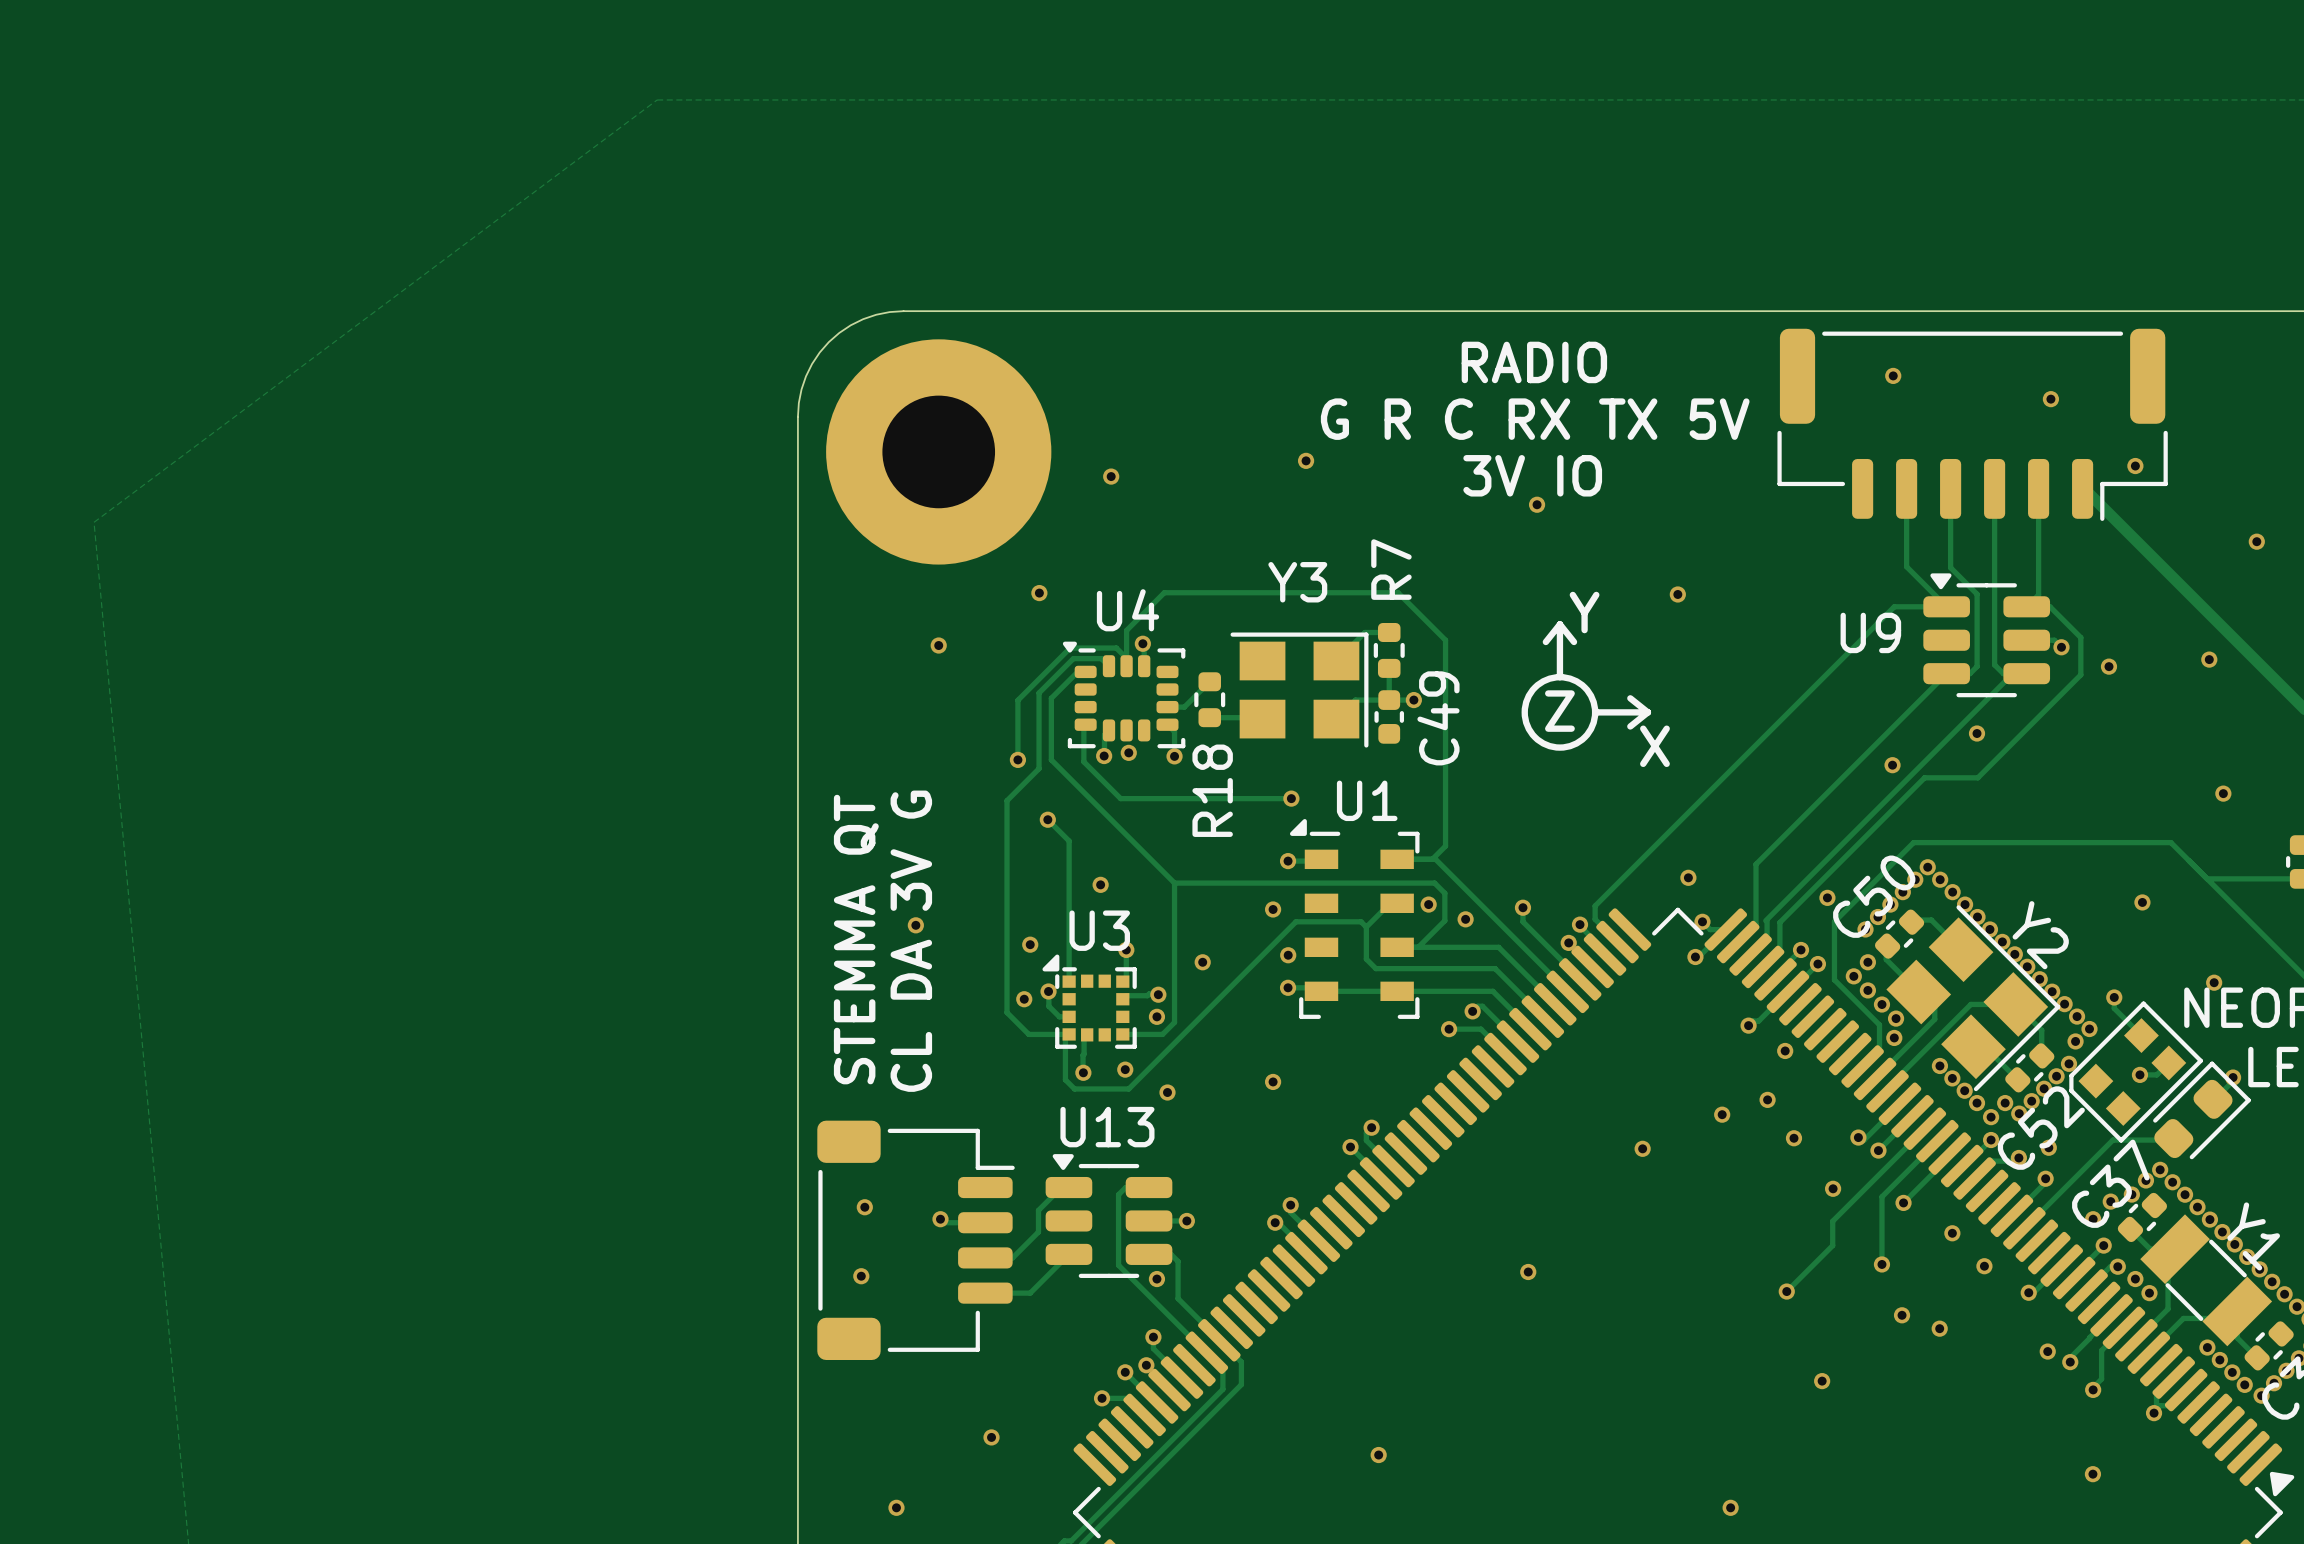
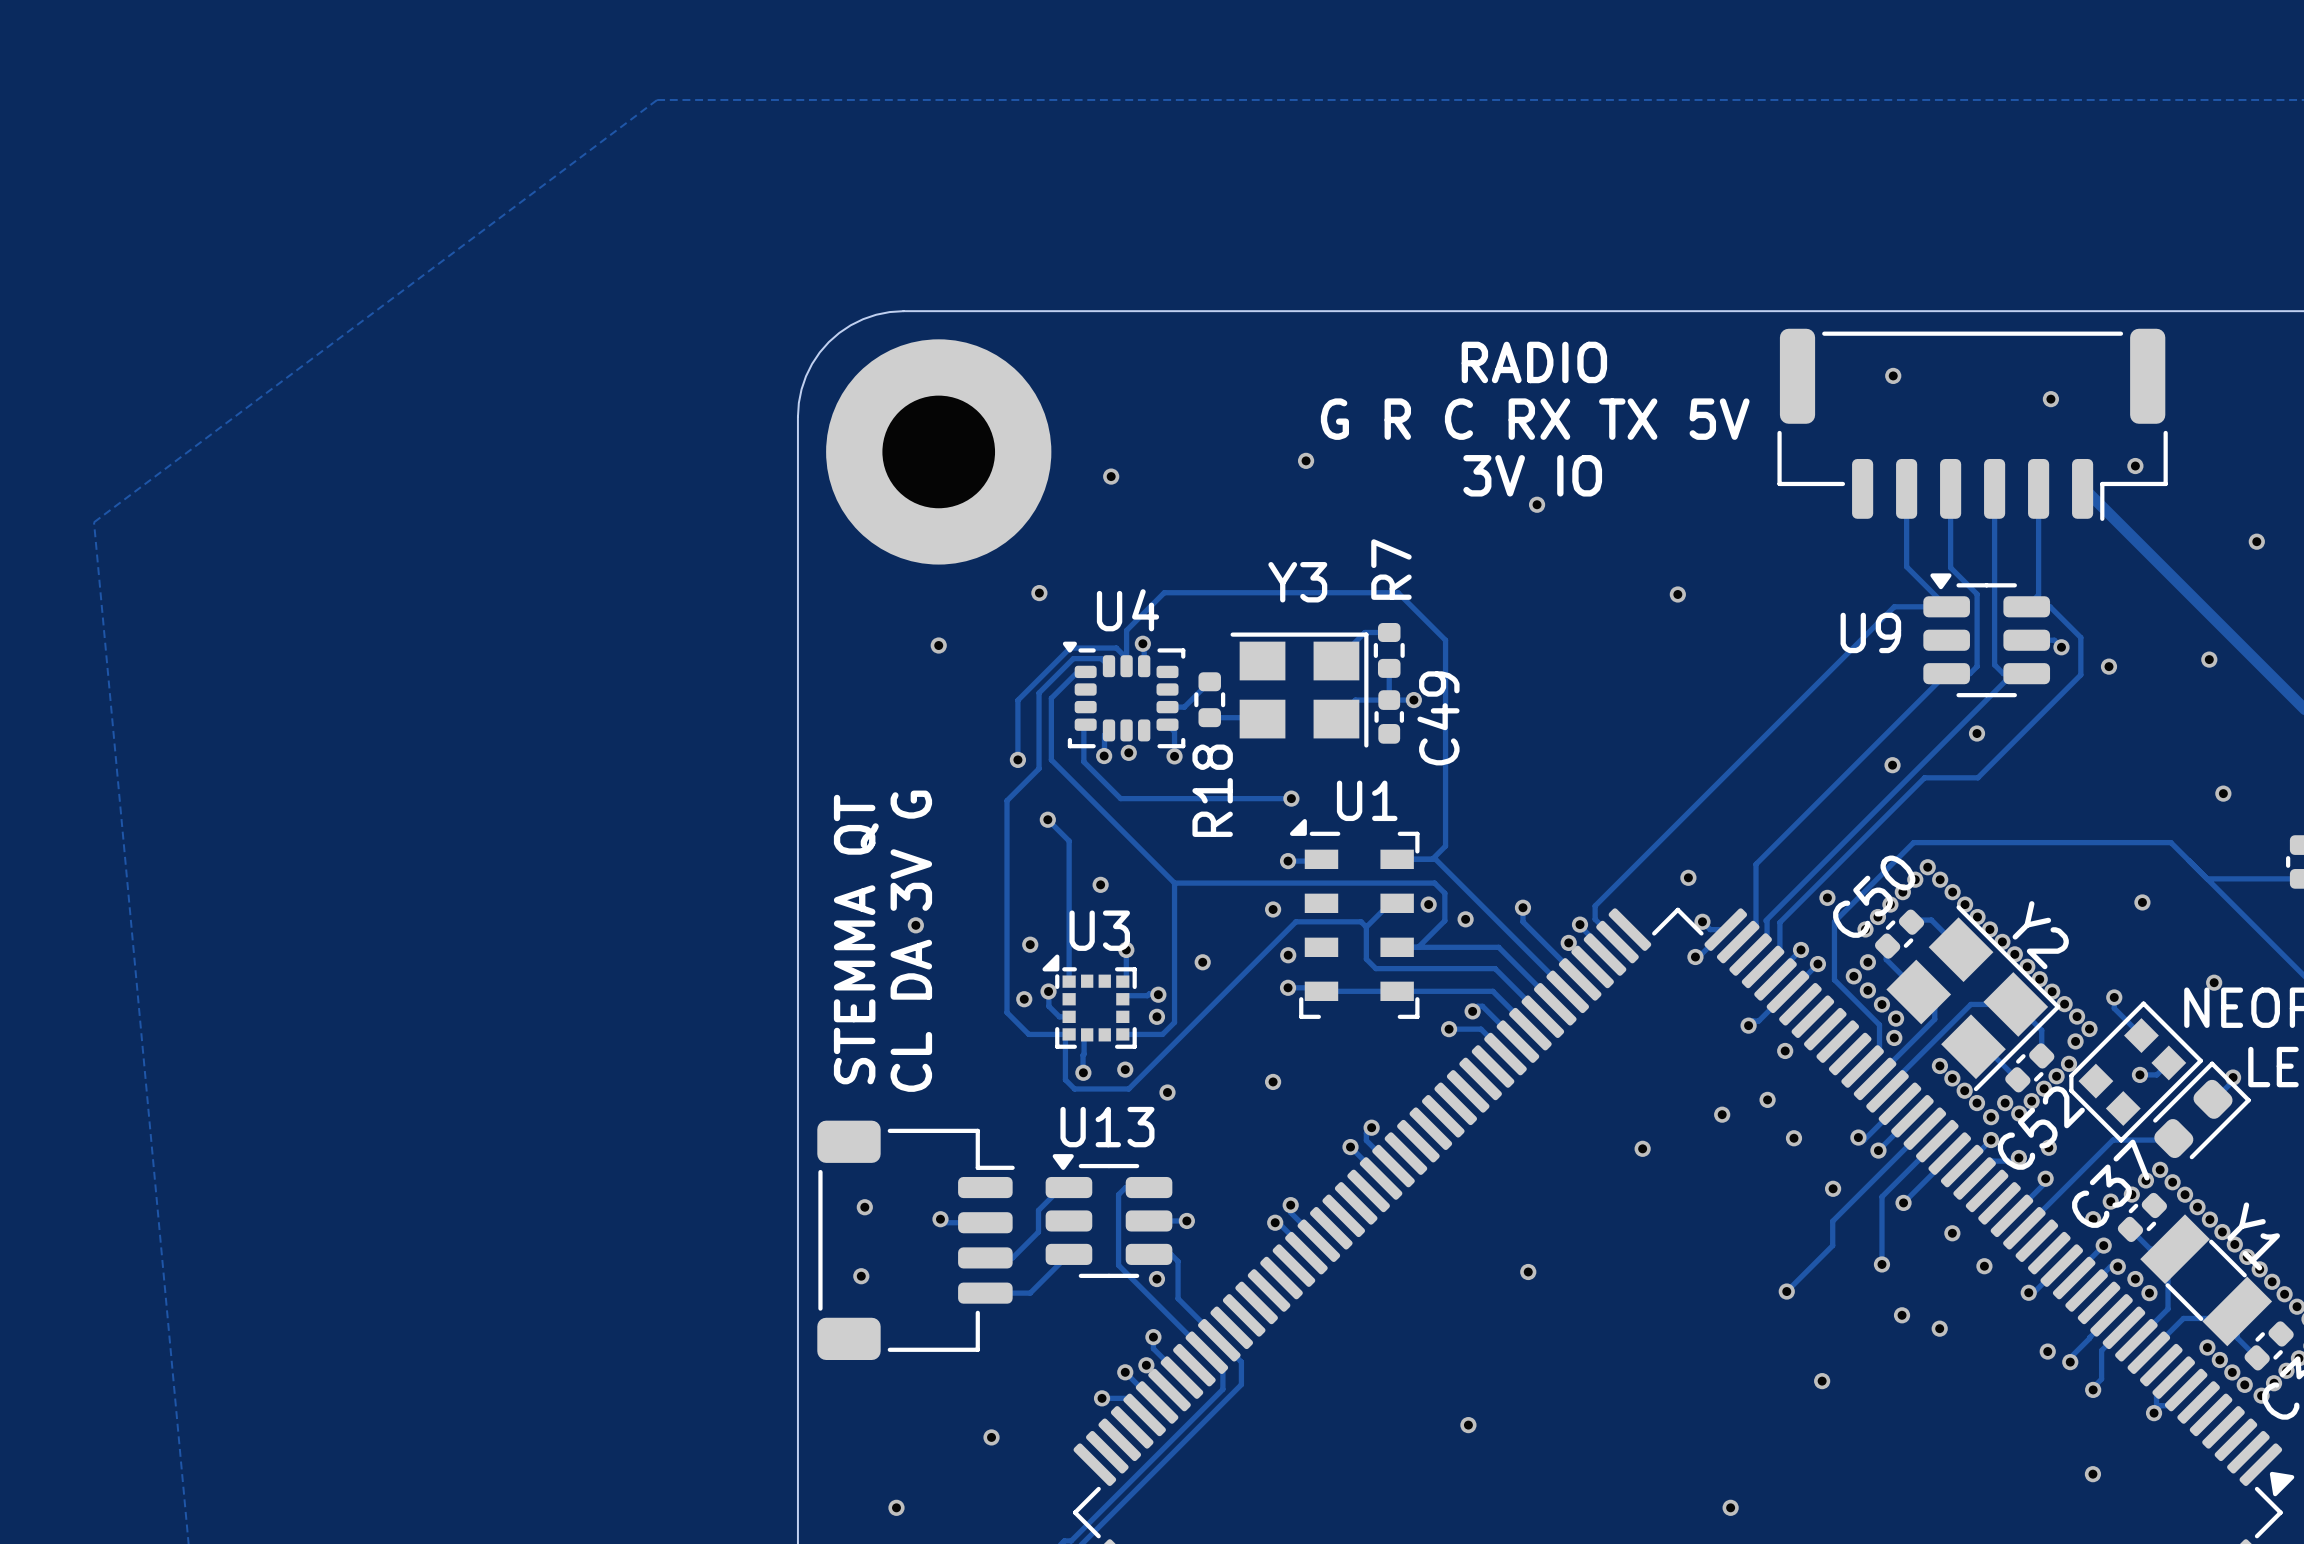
drawing: [1521, 621, 1652, 751] -> none
via position: (1378, 1455) -> (1468, 1425)

